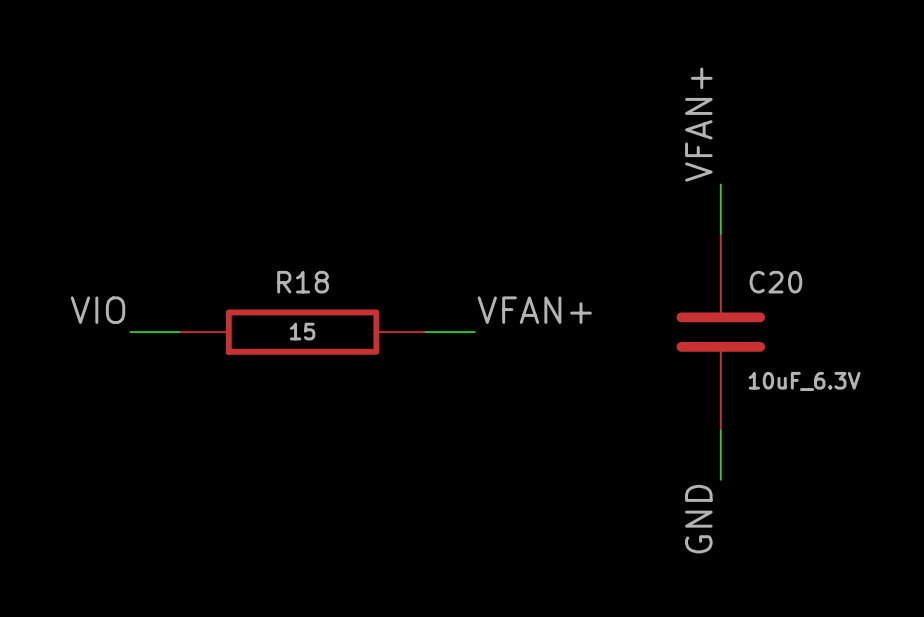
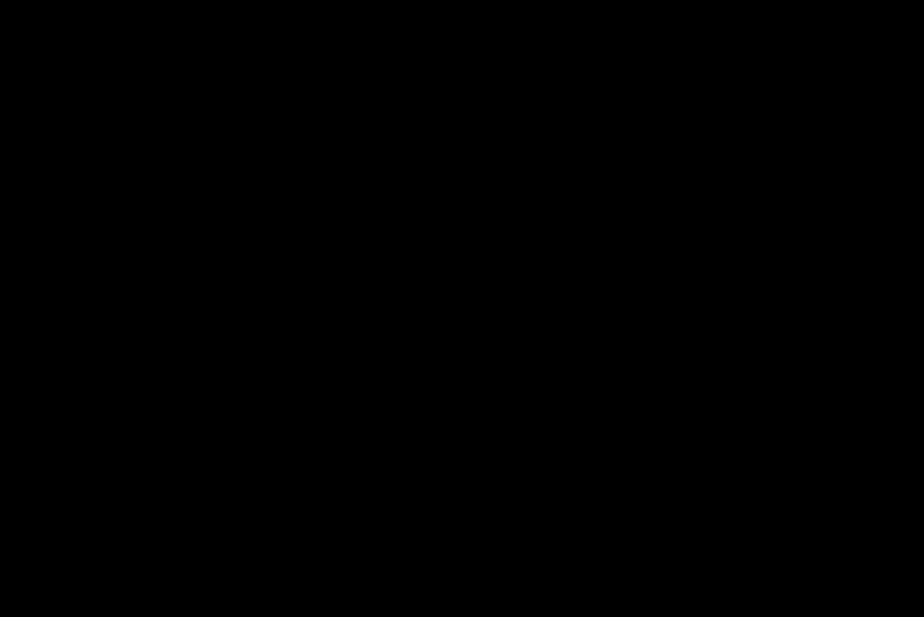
label: VFAN+ (698, 124) -> none
wire: (720, 184) (720, 233) -> none
label: VIO (97, 310) -> none
label: VFAN+ (534, 310) -> none
wire: (130, 332) (179, 332) -> none
R18: 15 (302, 332) -> none
wire: (425, 332) (474, 332) -> none
C20: 10uF_6.3V (720, 332) -> none
wire: (720, 430) (720, 479) -> none
label: GND (698, 519) -> none

